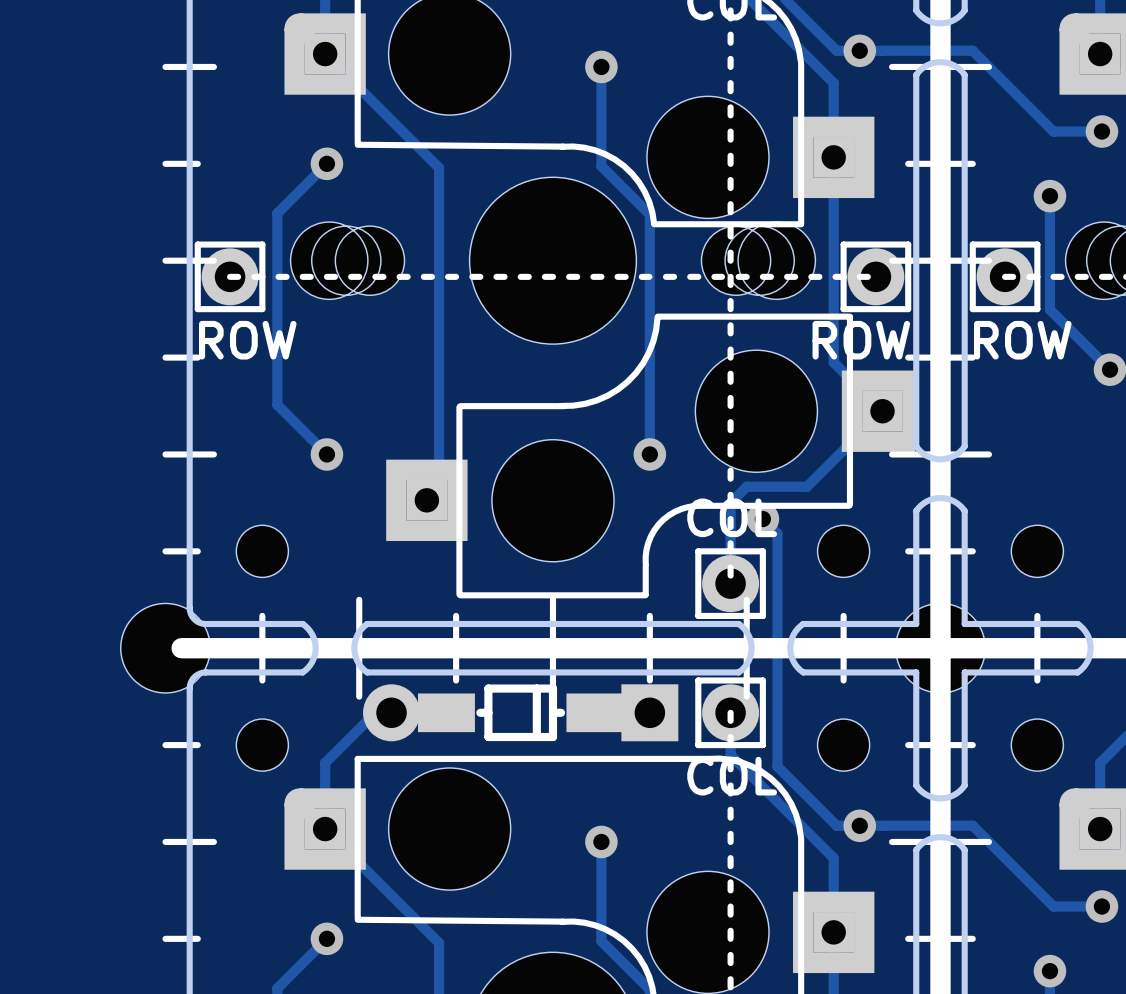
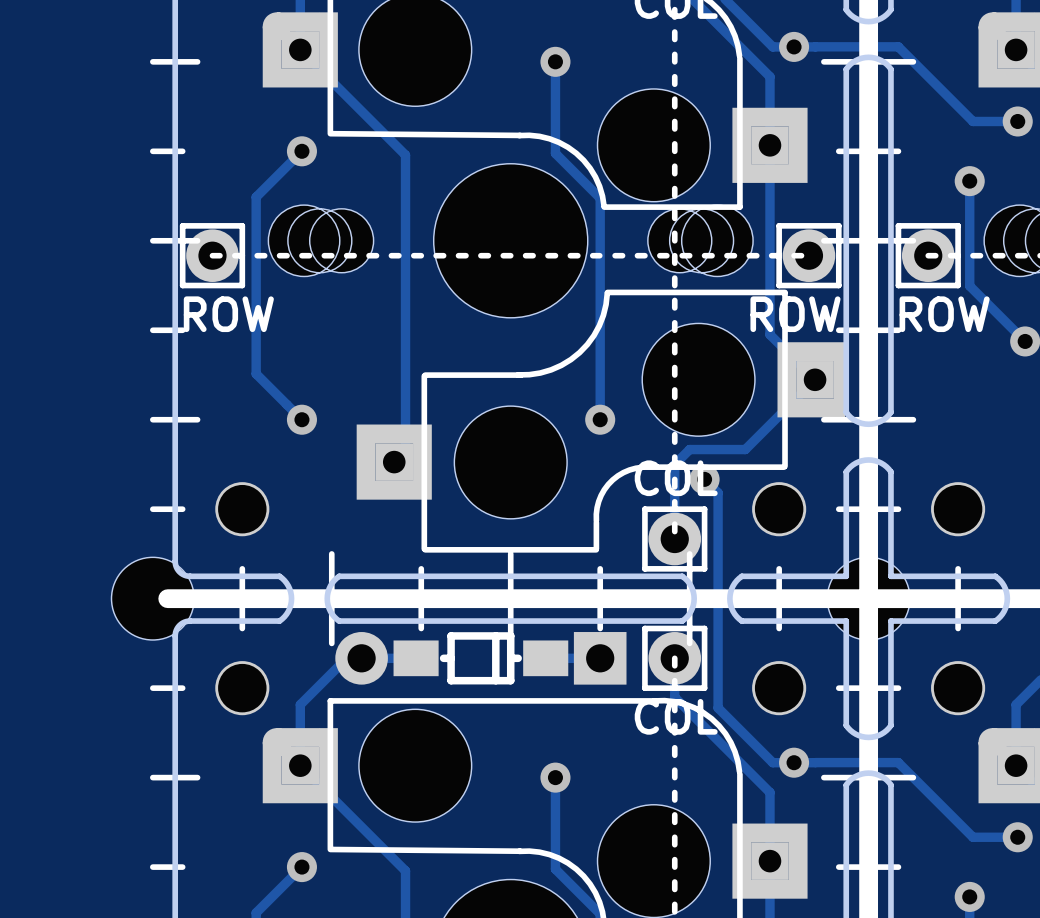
part footprint: [236, 525, 289, 578] -> [215, 482, 270, 537]
part footprint: [817, 525, 870, 578] -> [752, 482, 807, 537]
part footprint: [1011, 525, 1064, 578] -> [931, 482, 986, 537]
part footprint: [363, 684, 679, 742] -> [335, 632, 627, 685]
part footprint: [236, 719, 289, 772] -> [215, 661, 270, 716]
part footprint: [817, 719, 870, 772] -> [752, 661, 807, 716]
part footprint: [1011, 719, 1064, 772] -> [931, 661, 986, 716]

